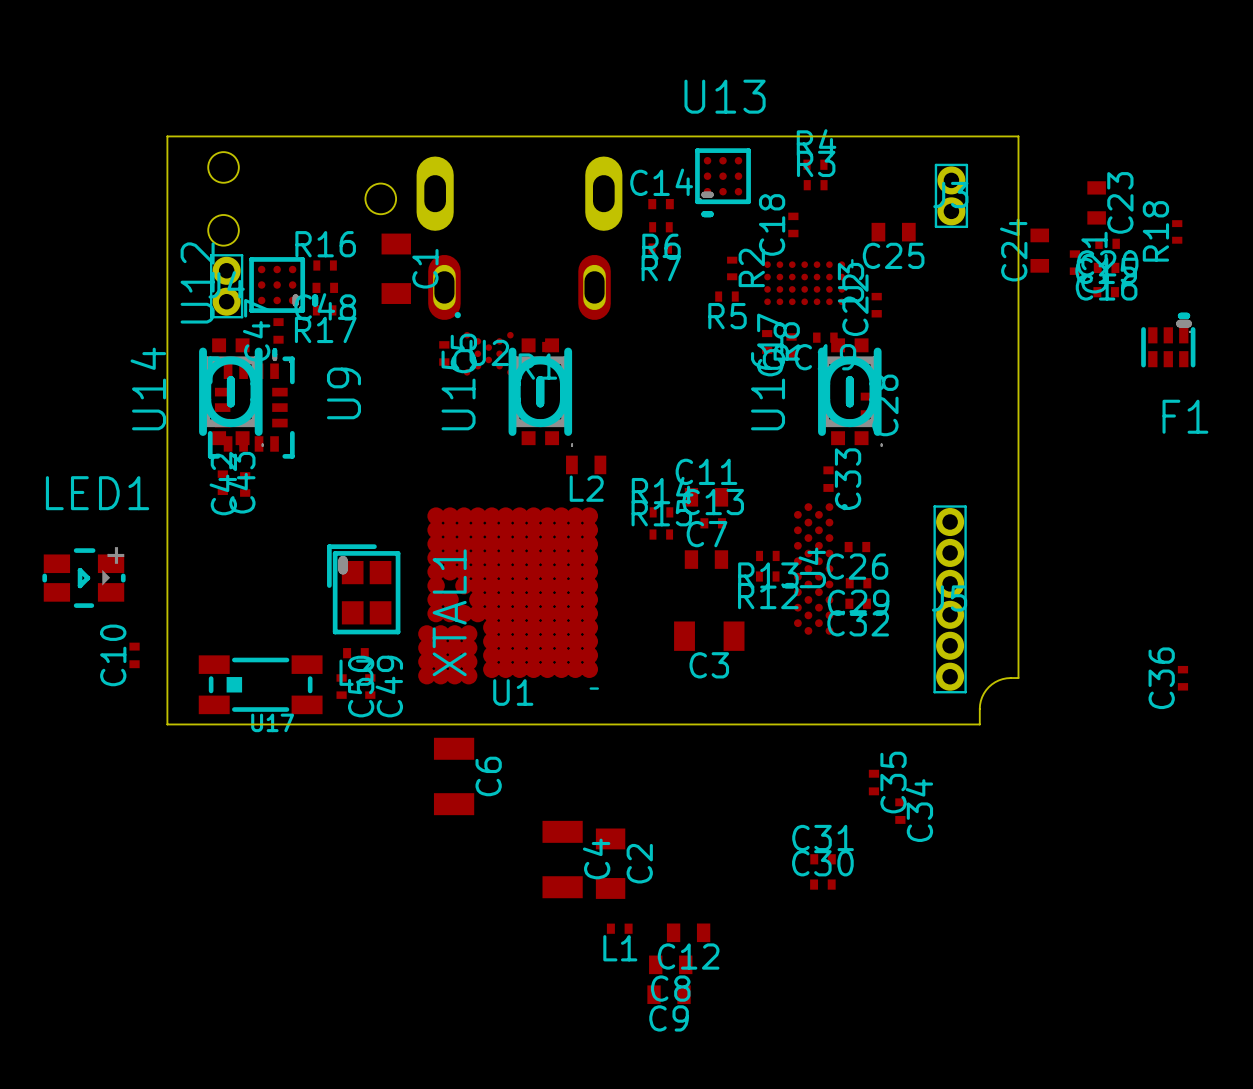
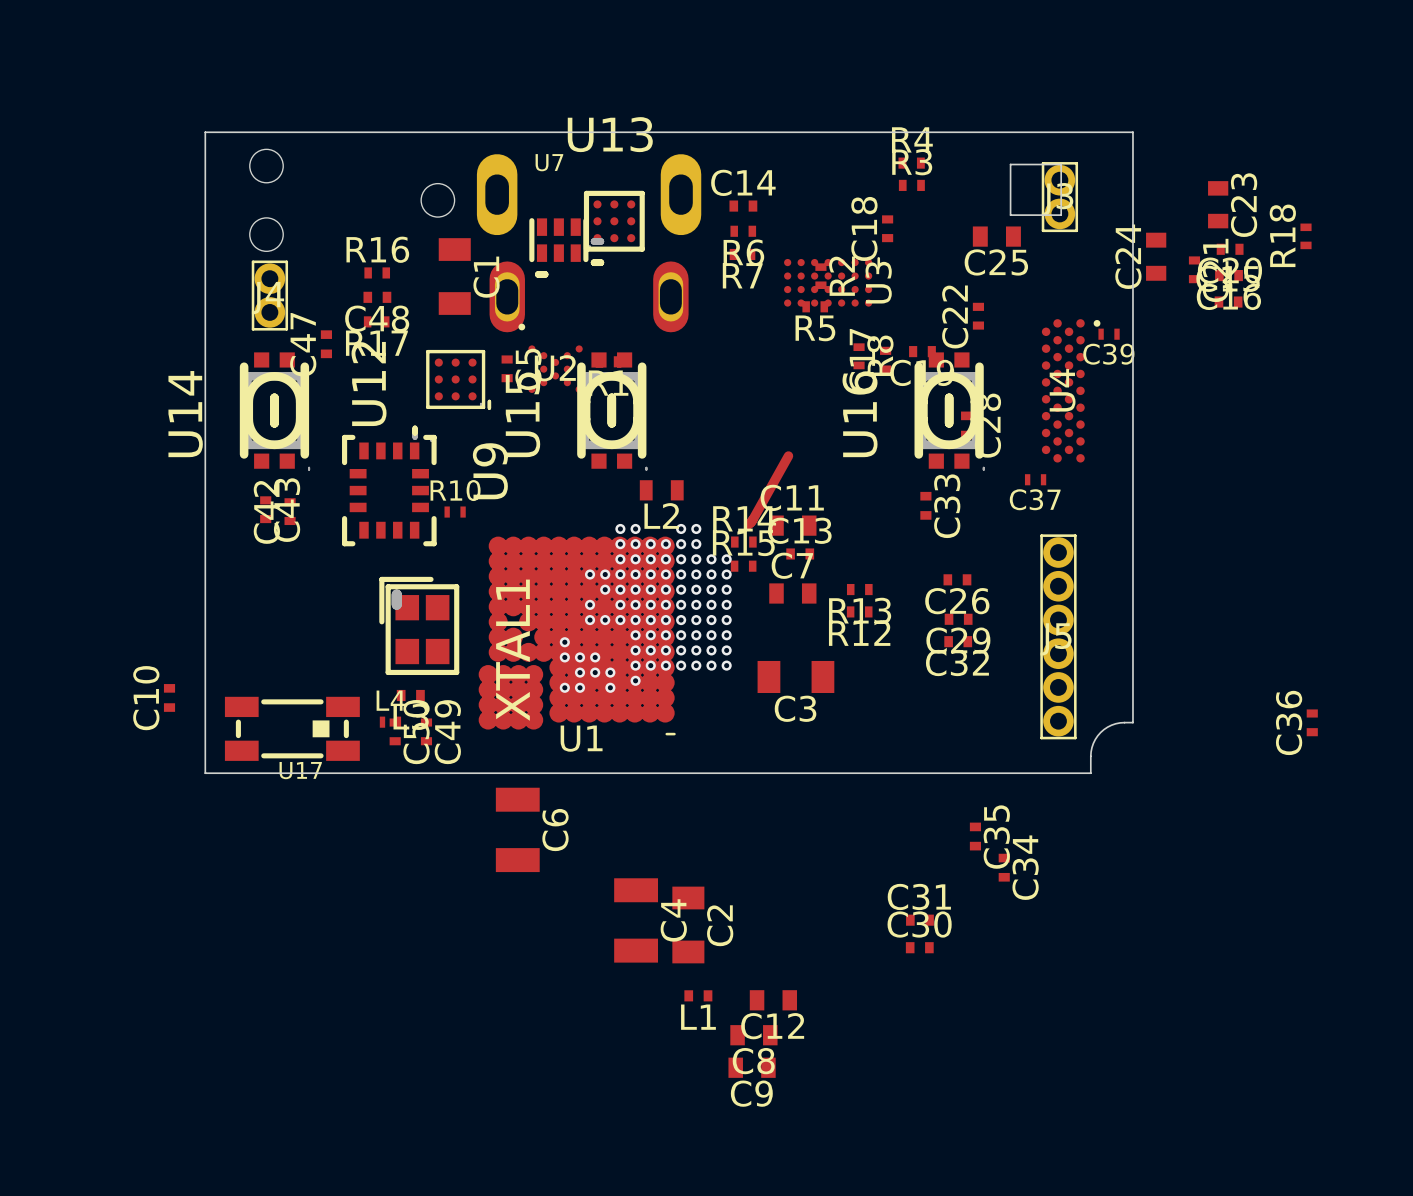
board edge: none -> (1010, 164) (1061, 164) (1061, 215) (1010, 215) (1010, 164)
U13 position: (723, 182) -> (614, 228)
U7: none -> (558, 247)
U12 footprint: [249, 257, 319, 313] -> [426, 349, 492, 410]
U3 footprint: [764, 258, 854, 306] -> [784, 257, 881, 307]
C39: none -> (1109, 334)
F1: (1168, 340) -> none
U9 position: (251, 403) -> (389, 485)
track: none -> (788, 456) (748, 524)
C37: none -> (1035, 479)
R10: none -> (455, 512)
via: none -> (620, 528)
via: none -> (635, 528)
via: none -> (681, 528)
via: none -> (696, 528)
via: none -> (620, 544)
via: none -> (635, 544)
via: none -> (650, 544)
via: none -> (665, 544)
via: none -> (681, 544)
via: none -> (696, 544)
via: none -> (620, 559)
via: none -> (635, 559)
via: none -> (650, 559)
via: none -> (665, 559)
via: none -> (681, 559)
via: none -> (696, 559)
via: none -> (711, 559)
via: none -> (726, 559)
via: none -> (590, 574)
via: none -> (605, 574)
via: none -> (620, 574)
via: none -> (635, 574)
via: none -> (650, 574)
via: none -> (665, 574)
via: none -> (681, 574)
via: none -> (696, 574)
via: none -> (711, 574)
via: none -> (726, 574)
via: none -> (605, 589)
via: none -> (620, 589)
via: none -> (635, 589)
via: none -> (650, 589)
via: none -> (665, 589)
via: none -> (681, 589)
via: none -> (696, 589)
via: none -> (711, 589)
via: none -> (726, 589)
U4 position: (820, 569) -> (1071, 390)
via: none -> (590, 604)
via: none -> (620, 604)
via: none -> (635, 604)
via: none -> (650, 604)
via: none -> (665, 604)
via: none -> (681, 604)
via: none -> (696, 604)
via: none -> (711, 604)
via: none -> (726, 604)
LED1: (83, 577) -> none
via: none -> (590, 620)
via: none -> (605, 620)
via: none -> (620, 620)
via: none -> (635, 620)
via: none -> (650, 620)
via: none -> (665, 620)
via: none -> (681, 620)
via: none -> (696, 620)
via: none -> (711, 620)
via: none -> (726, 620)
via: none -> (635, 635)
via: none -> (650, 635)
via: none -> (665, 635)
via: none -> (681, 635)
via: none -> (696, 635)
via: none -> (711, 635)
via: none -> (726, 635)
via: none -> (564, 642)
via: none -> (635, 650)
via: none -> (650, 650)
via: none -> (665, 650)
via: none -> (681, 650)
via: none -> (696, 650)
via: none -> (711, 650)
via: none -> (726, 650)
via: none -> (564, 657)
via: none -> (580, 657)
via: none -> (595, 657)
via: none -> (635, 665)
via: none -> (650, 665)
via: none -> (665, 665)
via: none -> (681, 665)
via: none -> (696, 665)
via: none -> (711, 665)
via: none -> (726, 665)
via: none -> (580, 672)
via: none -> (595, 672)
via: none -> (610, 672)
via: none -> (635, 680)
via: none -> (564, 687)
via: none -> (580, 687)
via: none -> (610, 687)
L4: none -> (390, 722)
U17 rotation: 0° (260, 684) -> 180° (292, 728)

